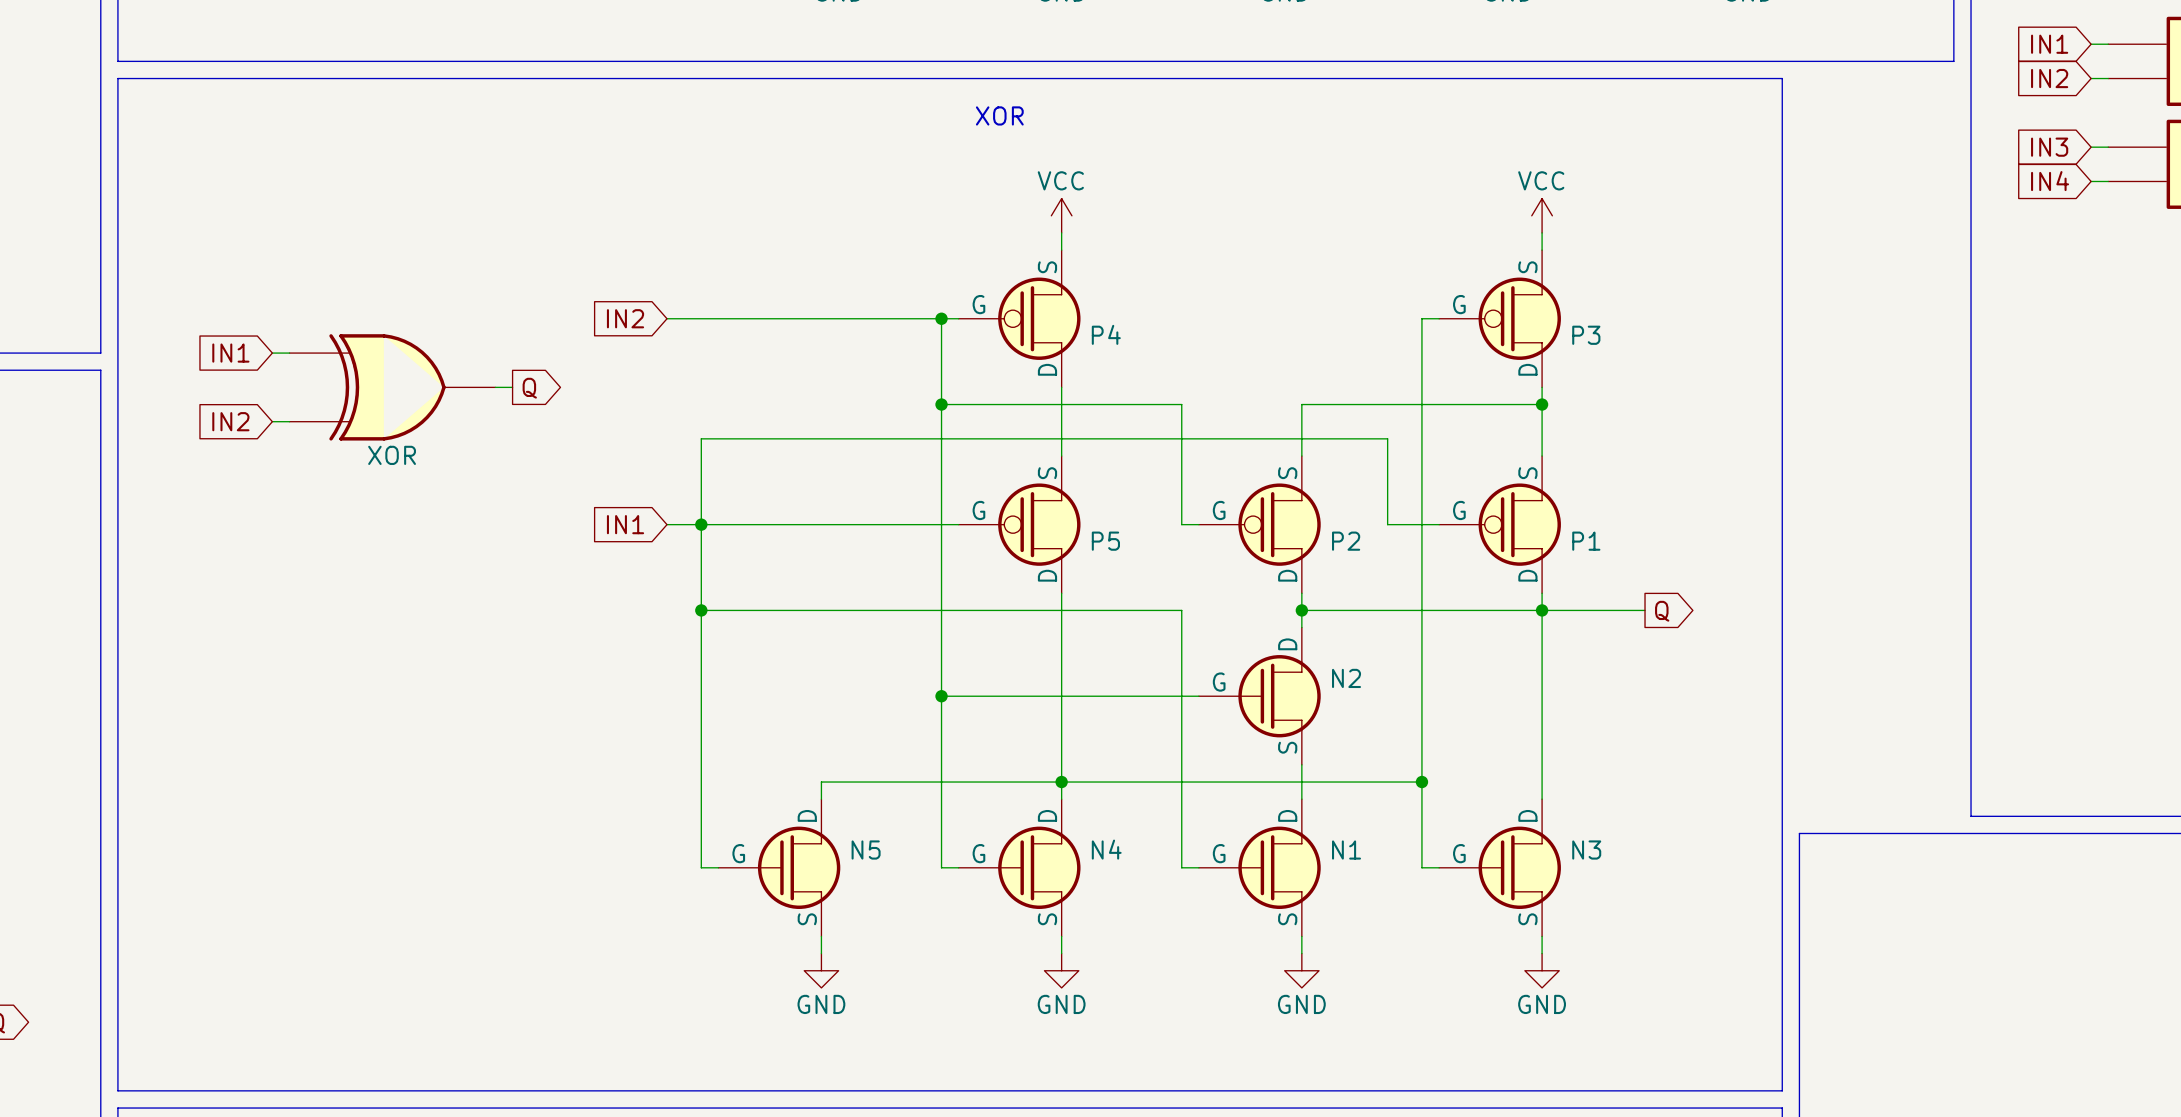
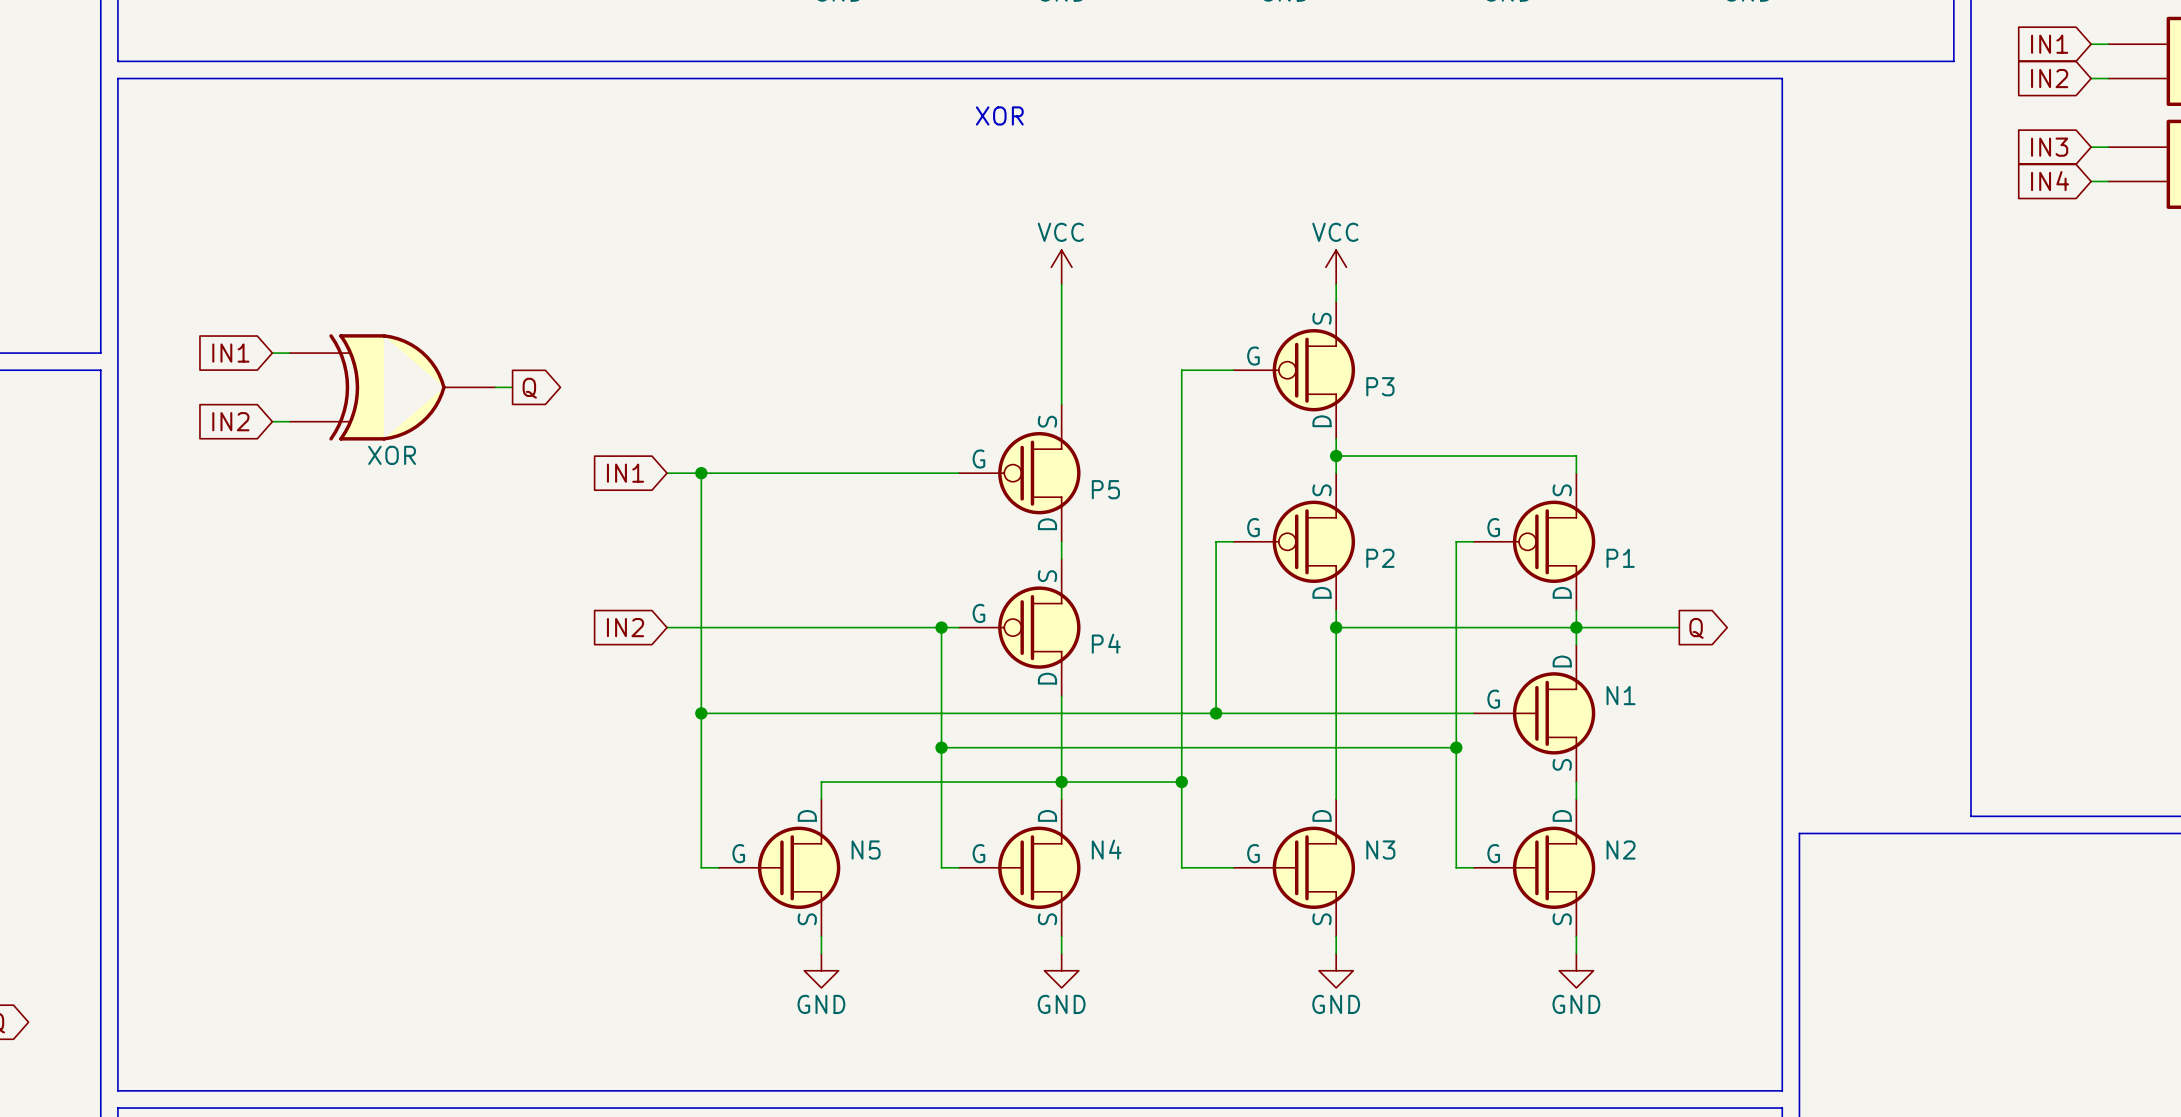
power symbol position: VCC (1061, 215) -> VCC (1061, 267)
power symbol: VCC (1542, 215) -> none
wire: (1542, 232) (1542, 250) -> (1336, 284) (1336, 301)
power symbol: none -> VCC (1336, 267)
global label position: IN2 (625, 318) -> IN2 (625, 627)
wire: (667, 318) (958, 318) -> (667, 627) (958, 627)
wire: (941, 318) (941, 627) -> none
junction: (941, 318) -> none
P4 position: (1019, 318) -> (1019, 627)
wire: (1439, 318) (1421, 318) (1421, 867) (1439, 867) -> none
P3 position: (1500, 318) -> (1294, 370)
wire: (1542, 387) (1542, 456) -> none
wire: (941, 404) (1181, 404) -> (1233, 370) (1181, 370) (1181, 404)
junction: (941, 404) -> none
wire: (1542, 404) (1301, 404) (1301, 456) -> none
junction: (1542, 404) -> none
wire: none -> (1336, 456) (1576, 456) (1576, 473)
junction: none -> (1336, 456)
wire: (701, 473) (701, 438) (1387, 438) (1387, 524) (1439, 524) -> none
global label position: IN1 (625, 524) -> IN1 (625, 473)
wire: (667, 524) (958, 524) -> (667, 473) (958, 473)
junction position: (701, 524) -> (701, 473)
P5 position: (1019, 524) -> (1019, 473)
wire: (1181, 524) (1198, 524) -> (1181, 524) (1181, 610)
P2 position: (1259, 524) -> (1294, 541)
P1 position: (1500, 524) -> (1534, 541)
wire: none -> (1233, 541) (1216, 541) (1216, 713)
wire: none -> (1473, 541) (1456, 541) (1456, 867) (1473, 867)
wire: (1301, 593) (1301, 627) -> (1336, 438) (1336, 473)
wire: (1542, 593) (1542, 799) -> none
wire: (701, 610) (1181, 610) -> none
junction: (701, 610) -> none
wire: (1301, 610) (1645, 610) -> (1336, 627) (1679, 627)
junction position: (1301, 610) -> (1336, 627)
wire: none -> (1336, 610) (1336, 799)
junction position: (1542, 610) -> (1576, 627)
global label position: Q (1662, 611) -> Q (1696, 628)
junction: none -> (941, 627)
wire: (941, 696) (1198, 696) -> none
junction: (941, 696) -> none
N2 position: (1259, 696) -> (1534, 867)
wire: none -> (701, 713) (1473, 713)
junction: none -> (701, 713)
junction: none -> (1216, 713)
wire: none -> (941, 747) (1456, 747)
junction: none -> (941, 747)
wire: (1301, 764) (1301, 799) -> (1576, 610) (1576, 644)
wire: (1181, 782) (1421, 782) -> none
junction: none -> (1181, 782)
junction position: (1421, 782) -> (1456, 747)
wire: none -> (1576, 782) (1576, 799)
N1 position: (1259, 867) -> (1534, 713)
N3 position: (1500, 867) -> (1294, 867)
wire: (1301, 936) (1301, 953) -> (1336, 936) (1336, 953)
wire: (1542, 936) (1542, 953) -> (1576, 936) (1576, 953)
power symbol position: GND (1301, 970) -> GND (1336, 970)
power symbol position: GND (1542, 970) -> GND (1576, 970)

